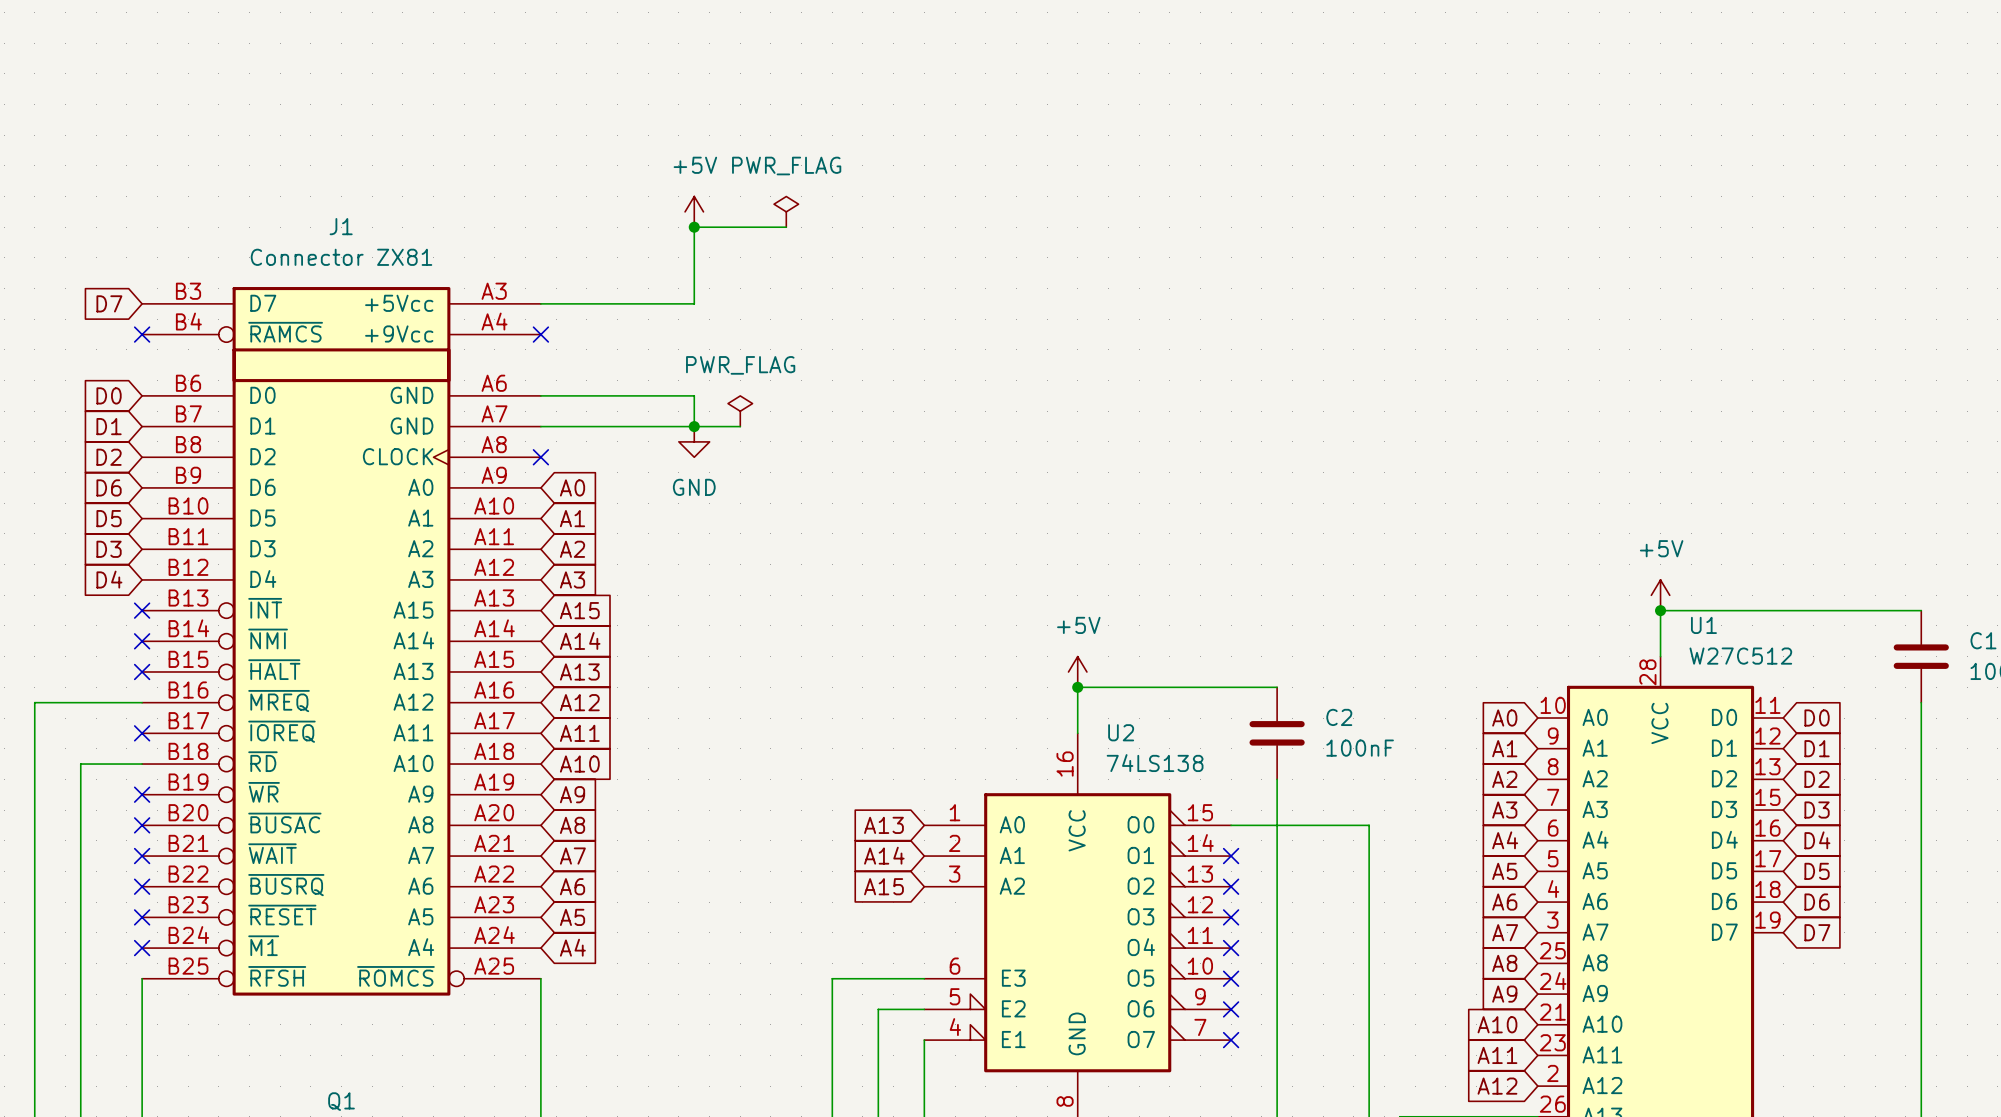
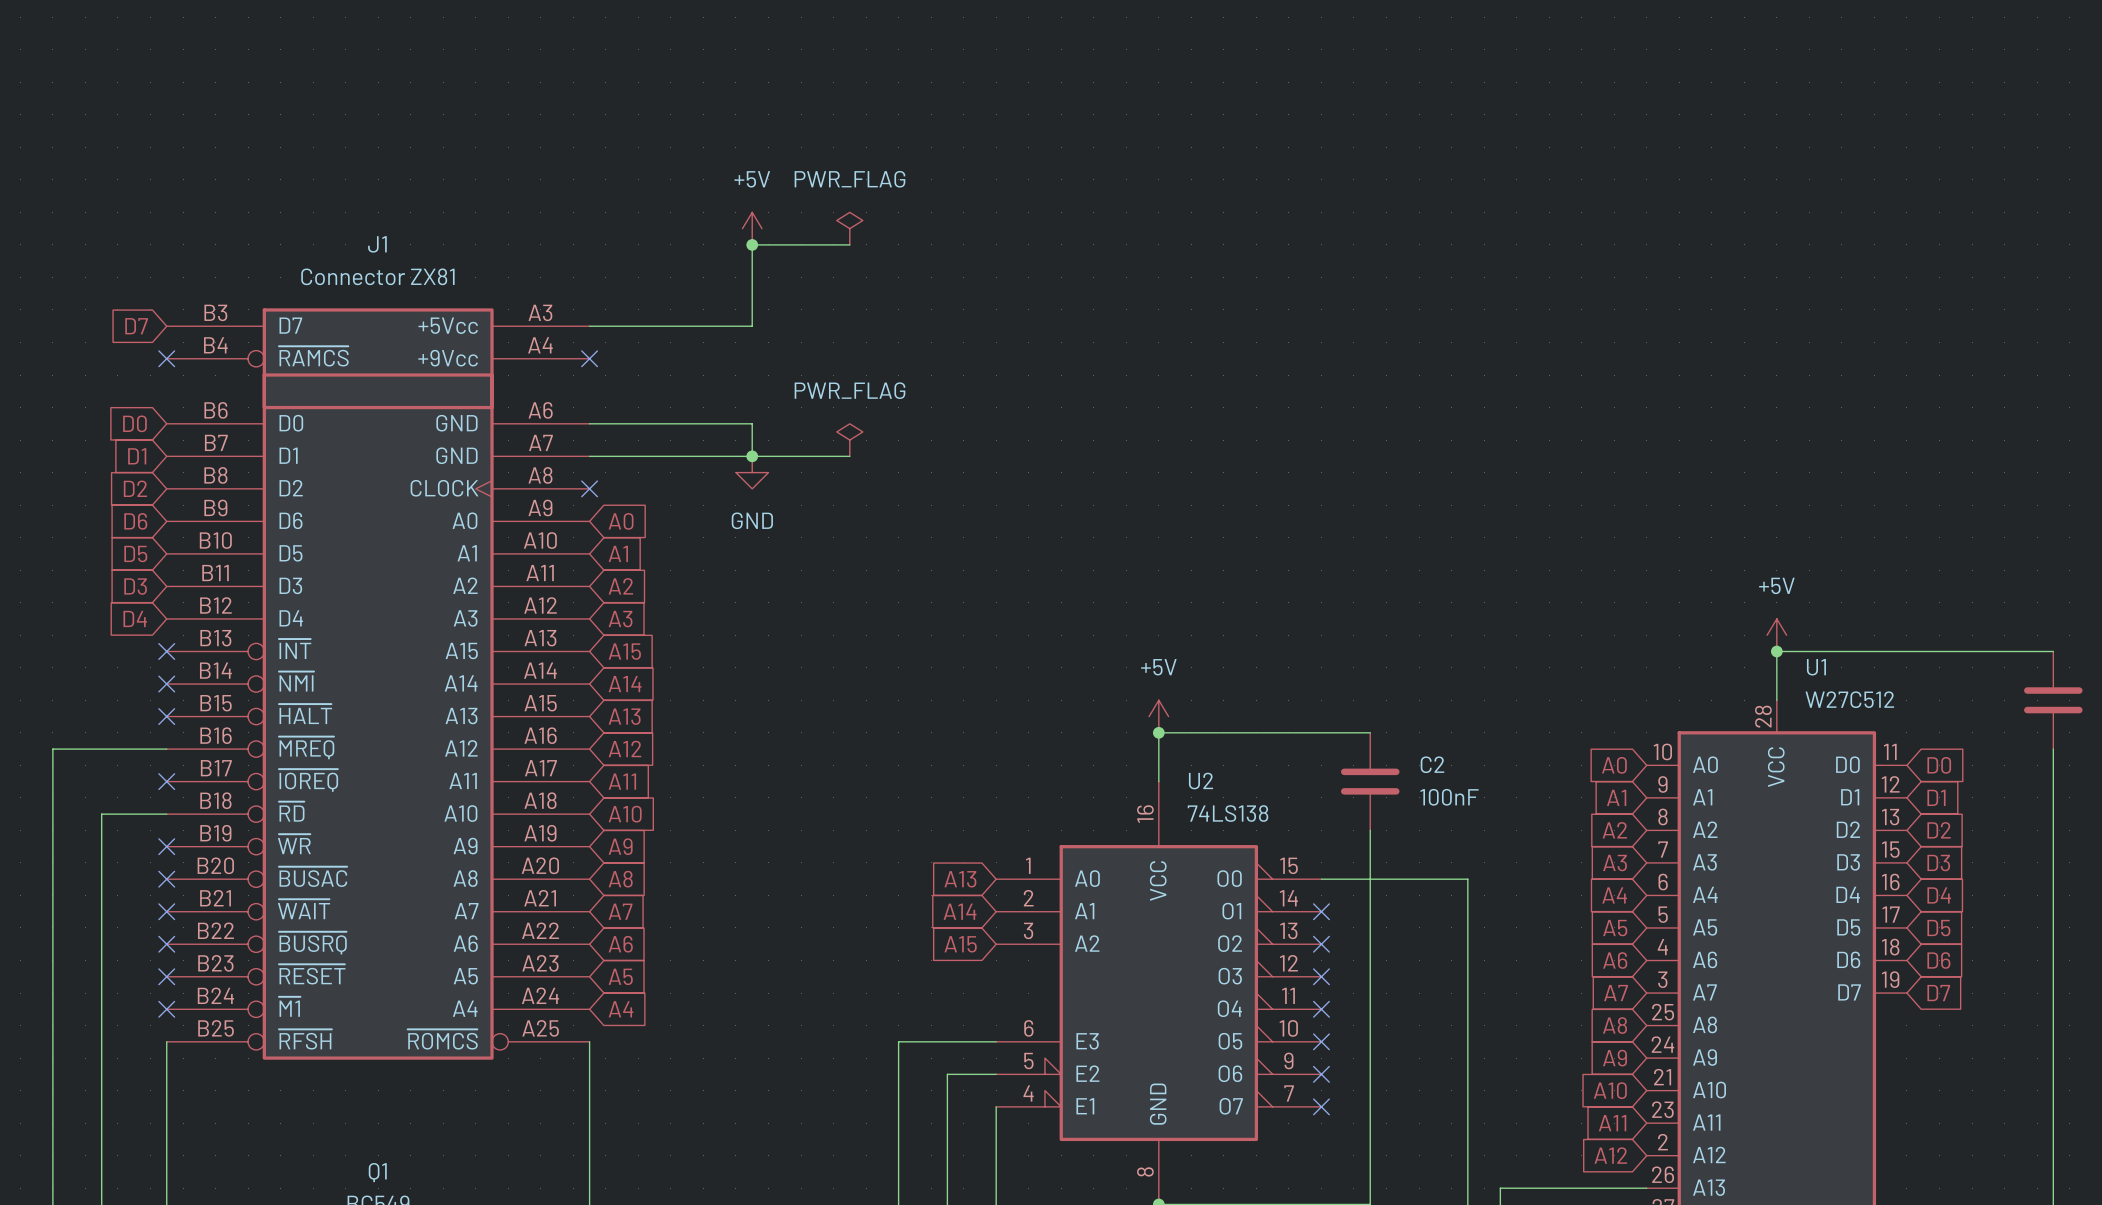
power symbol position: PWR_FLAG (740, 411) -> PWR_FLAG (849, 440)
wire: none -> (801, 456) (849, 456)

